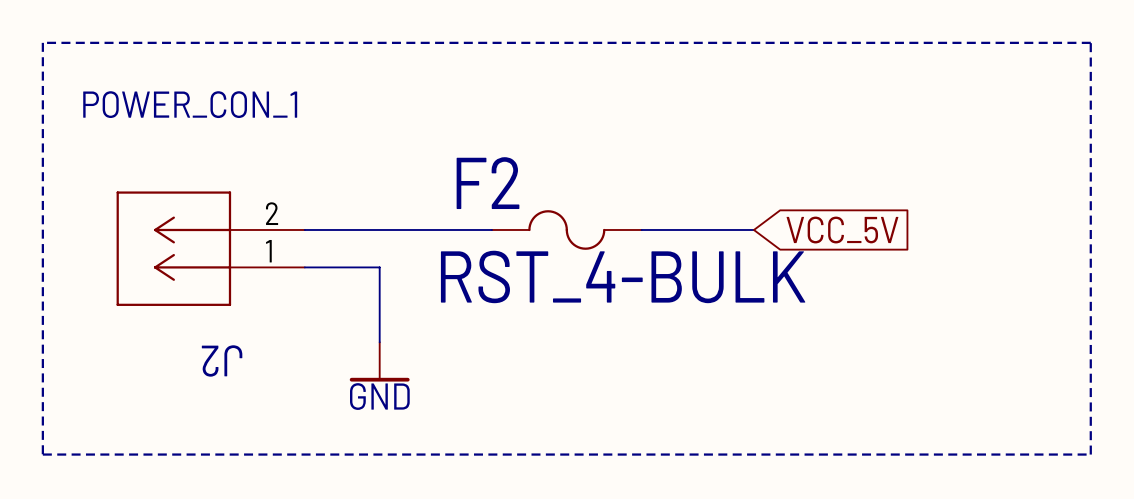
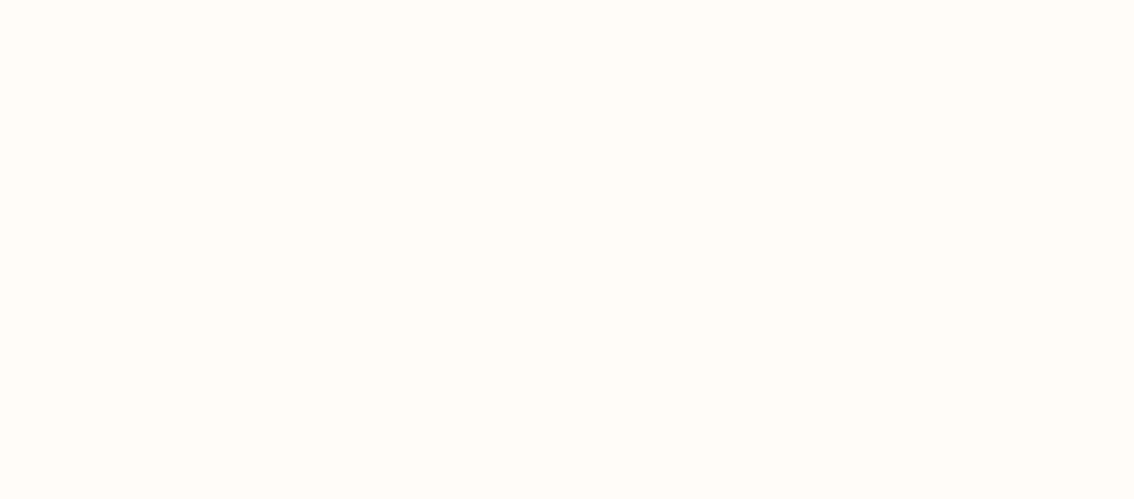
line: (42, 42) (42, 454) (1090, 454) (1090, 42) (42, 42) -> none
text: POWER_CON_1 (190, 104) -> none
wire: (304, 229) (491, 229) -> none
F2: RST_4-BULK (566, 229) -> none
wire: (641, 229) (753, 229) -> none
global label: VCC_5V (842, 230) -> none
J2: (210, 248) -> none
wire: (304, 267) (379, 267) (379, 342) -> none
power symbol: GND (379, 361) -> none

